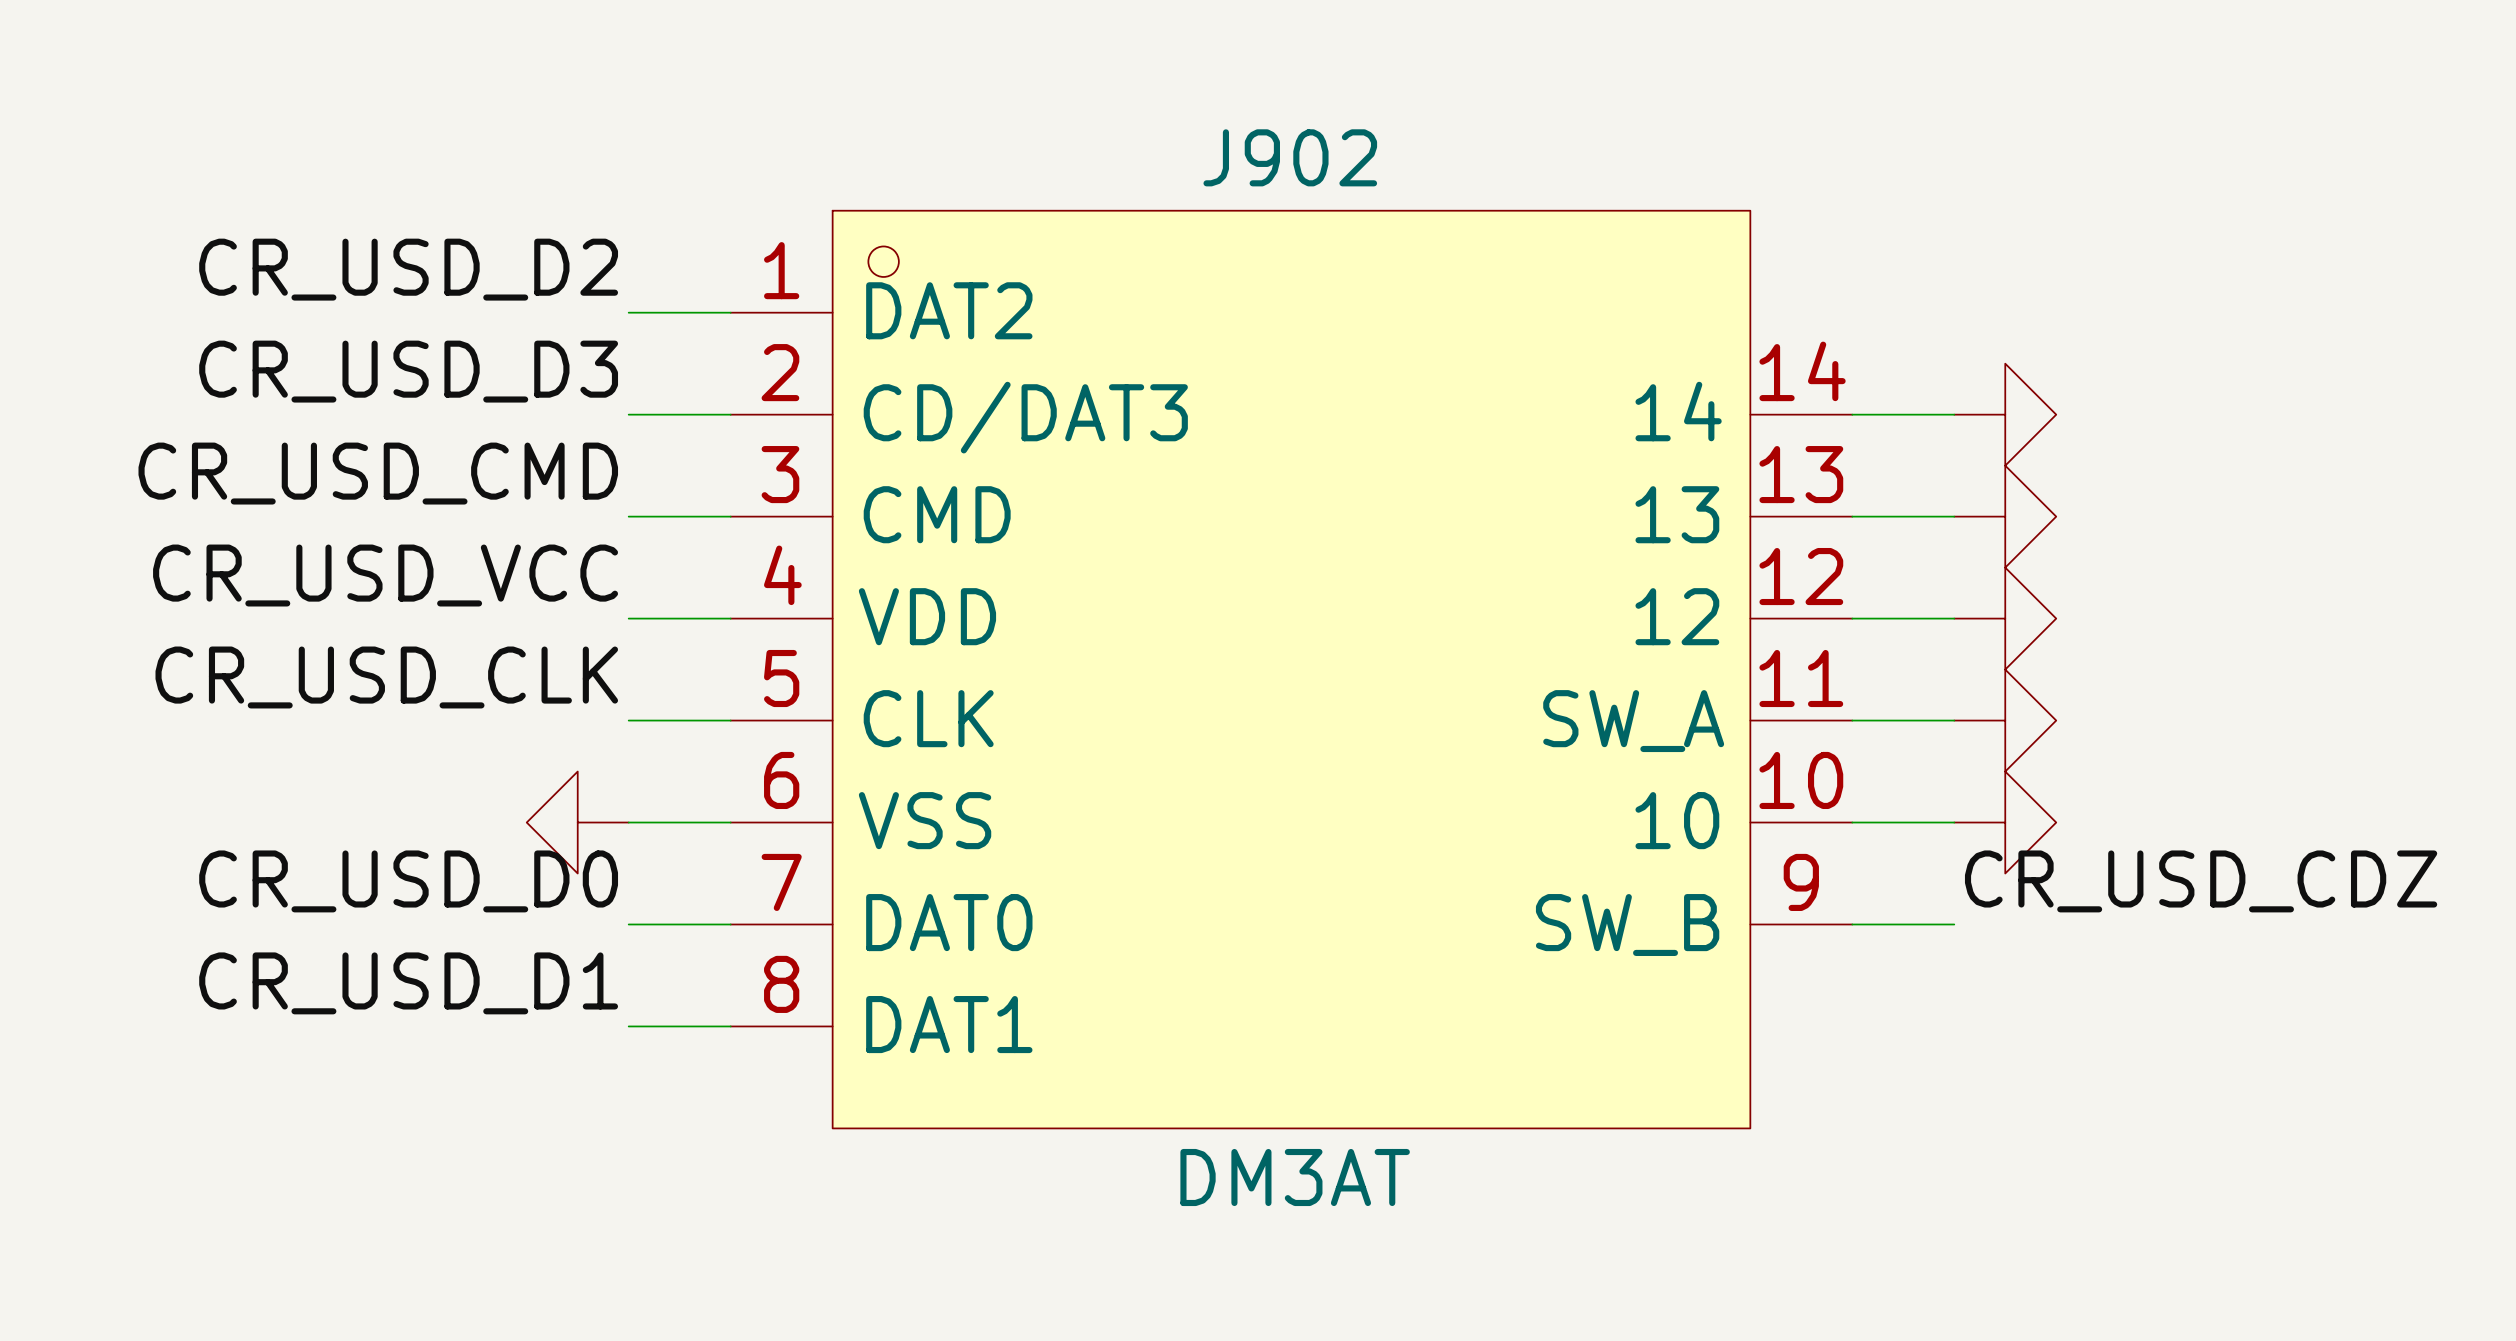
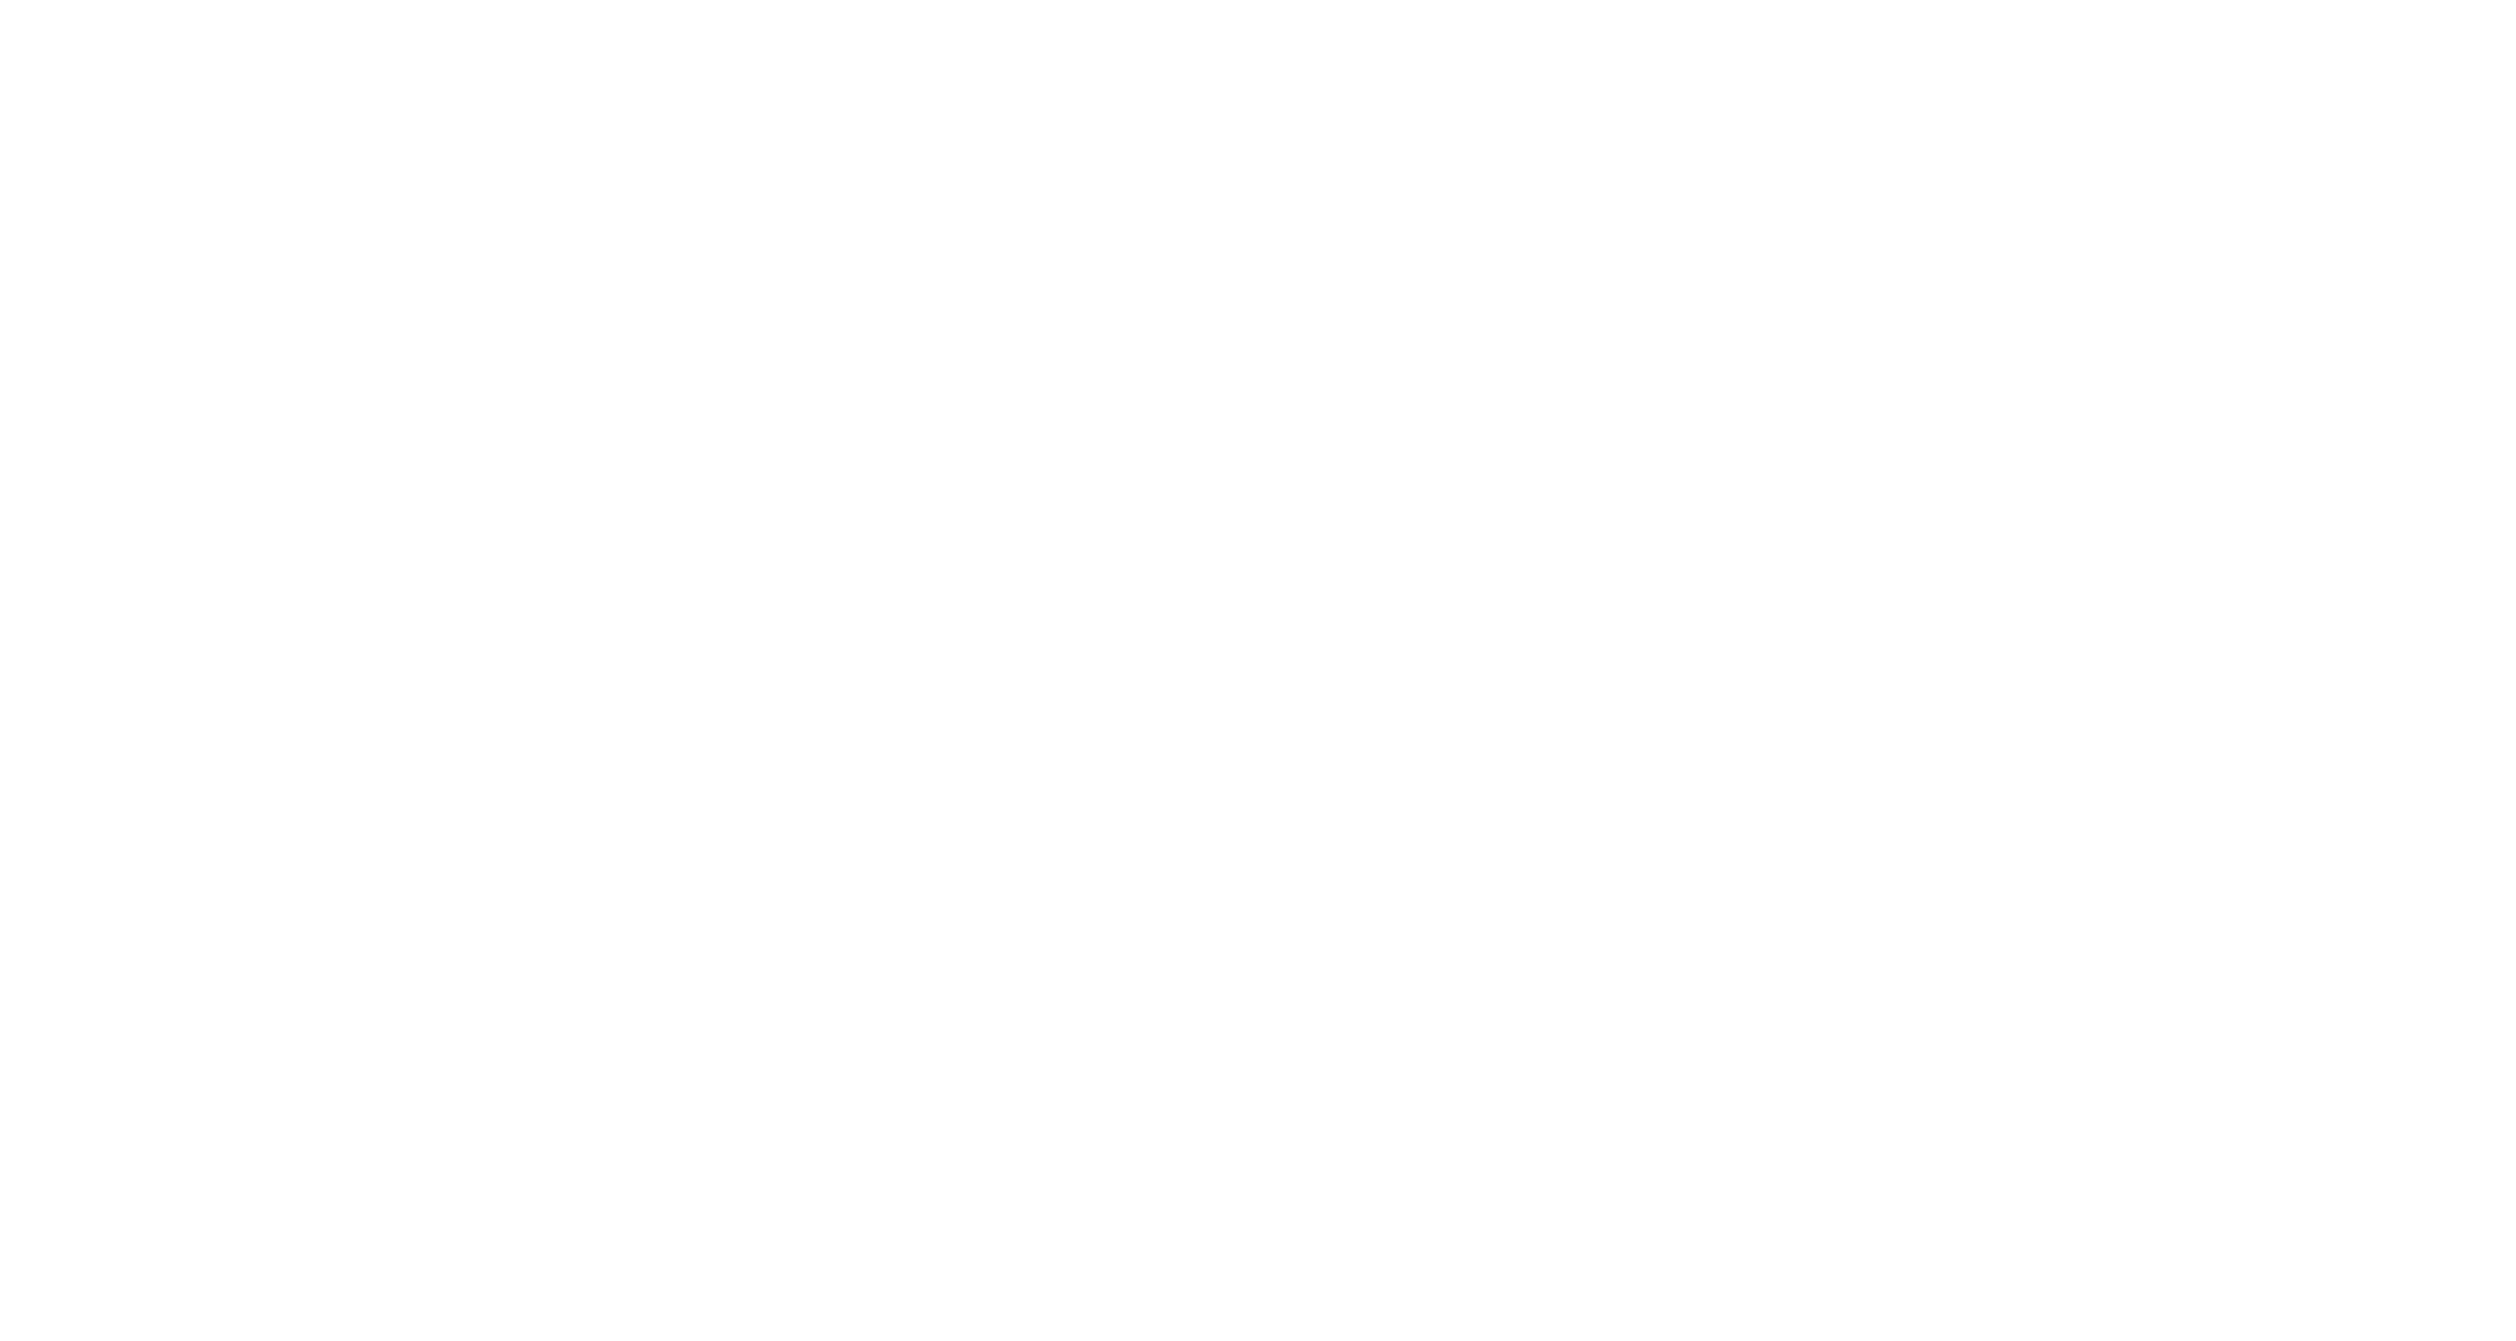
label: CR_USD_D2 (408, 269) -> none
wire: (628, 312) (730, 312) -> none
label: CR_USD_D3 (408, 371) -> none
wire: (628, 414) (730, 414) -> none
wire: (1852, 414) (1954, 414) -> none
power symbol: (2005, 414) -> none
label: CR_USD_CMD (378, 473) -> none
wire: (628, 516) (730, 516) -> none
wire: (1852, 516) (1954, 516) -> none
power symbol: (2005, 516) -> none
label: CR_USD_VCC (385, 575) -> none
wire: (628, 618) (730, 618) -> none
wire: (1852, 618) (1954, 618) -> none
power symbol: (2005, 618) -> none
J902: DM3AT (1291, 669) -> none
label: CR_USD_CLK (386, 677) -> none
wire: (628, 720) (730, 720) -> none
wire: (1852, 720) (1954, 720) -> none
power symbol: (2005, 720) -> none
power symbol: (577, 822) -> none
wire: (628, 822) (730, 822) -> none
wire: (1852, 822) (1954, 822) -> none
power symbol: (2005, 822) -> none
label: CR_USD_D0 (408, 881) -> none
label: CR_USD_CDZ (2201, 881) -> none
wire: (628, 924) (730, 924) -> none
wire: (1852, 924) (1954, 924) -> none
label: CR_USD_D1 (408, 983) -> none
wire: (628, 1026) (730, 1026) -> none

